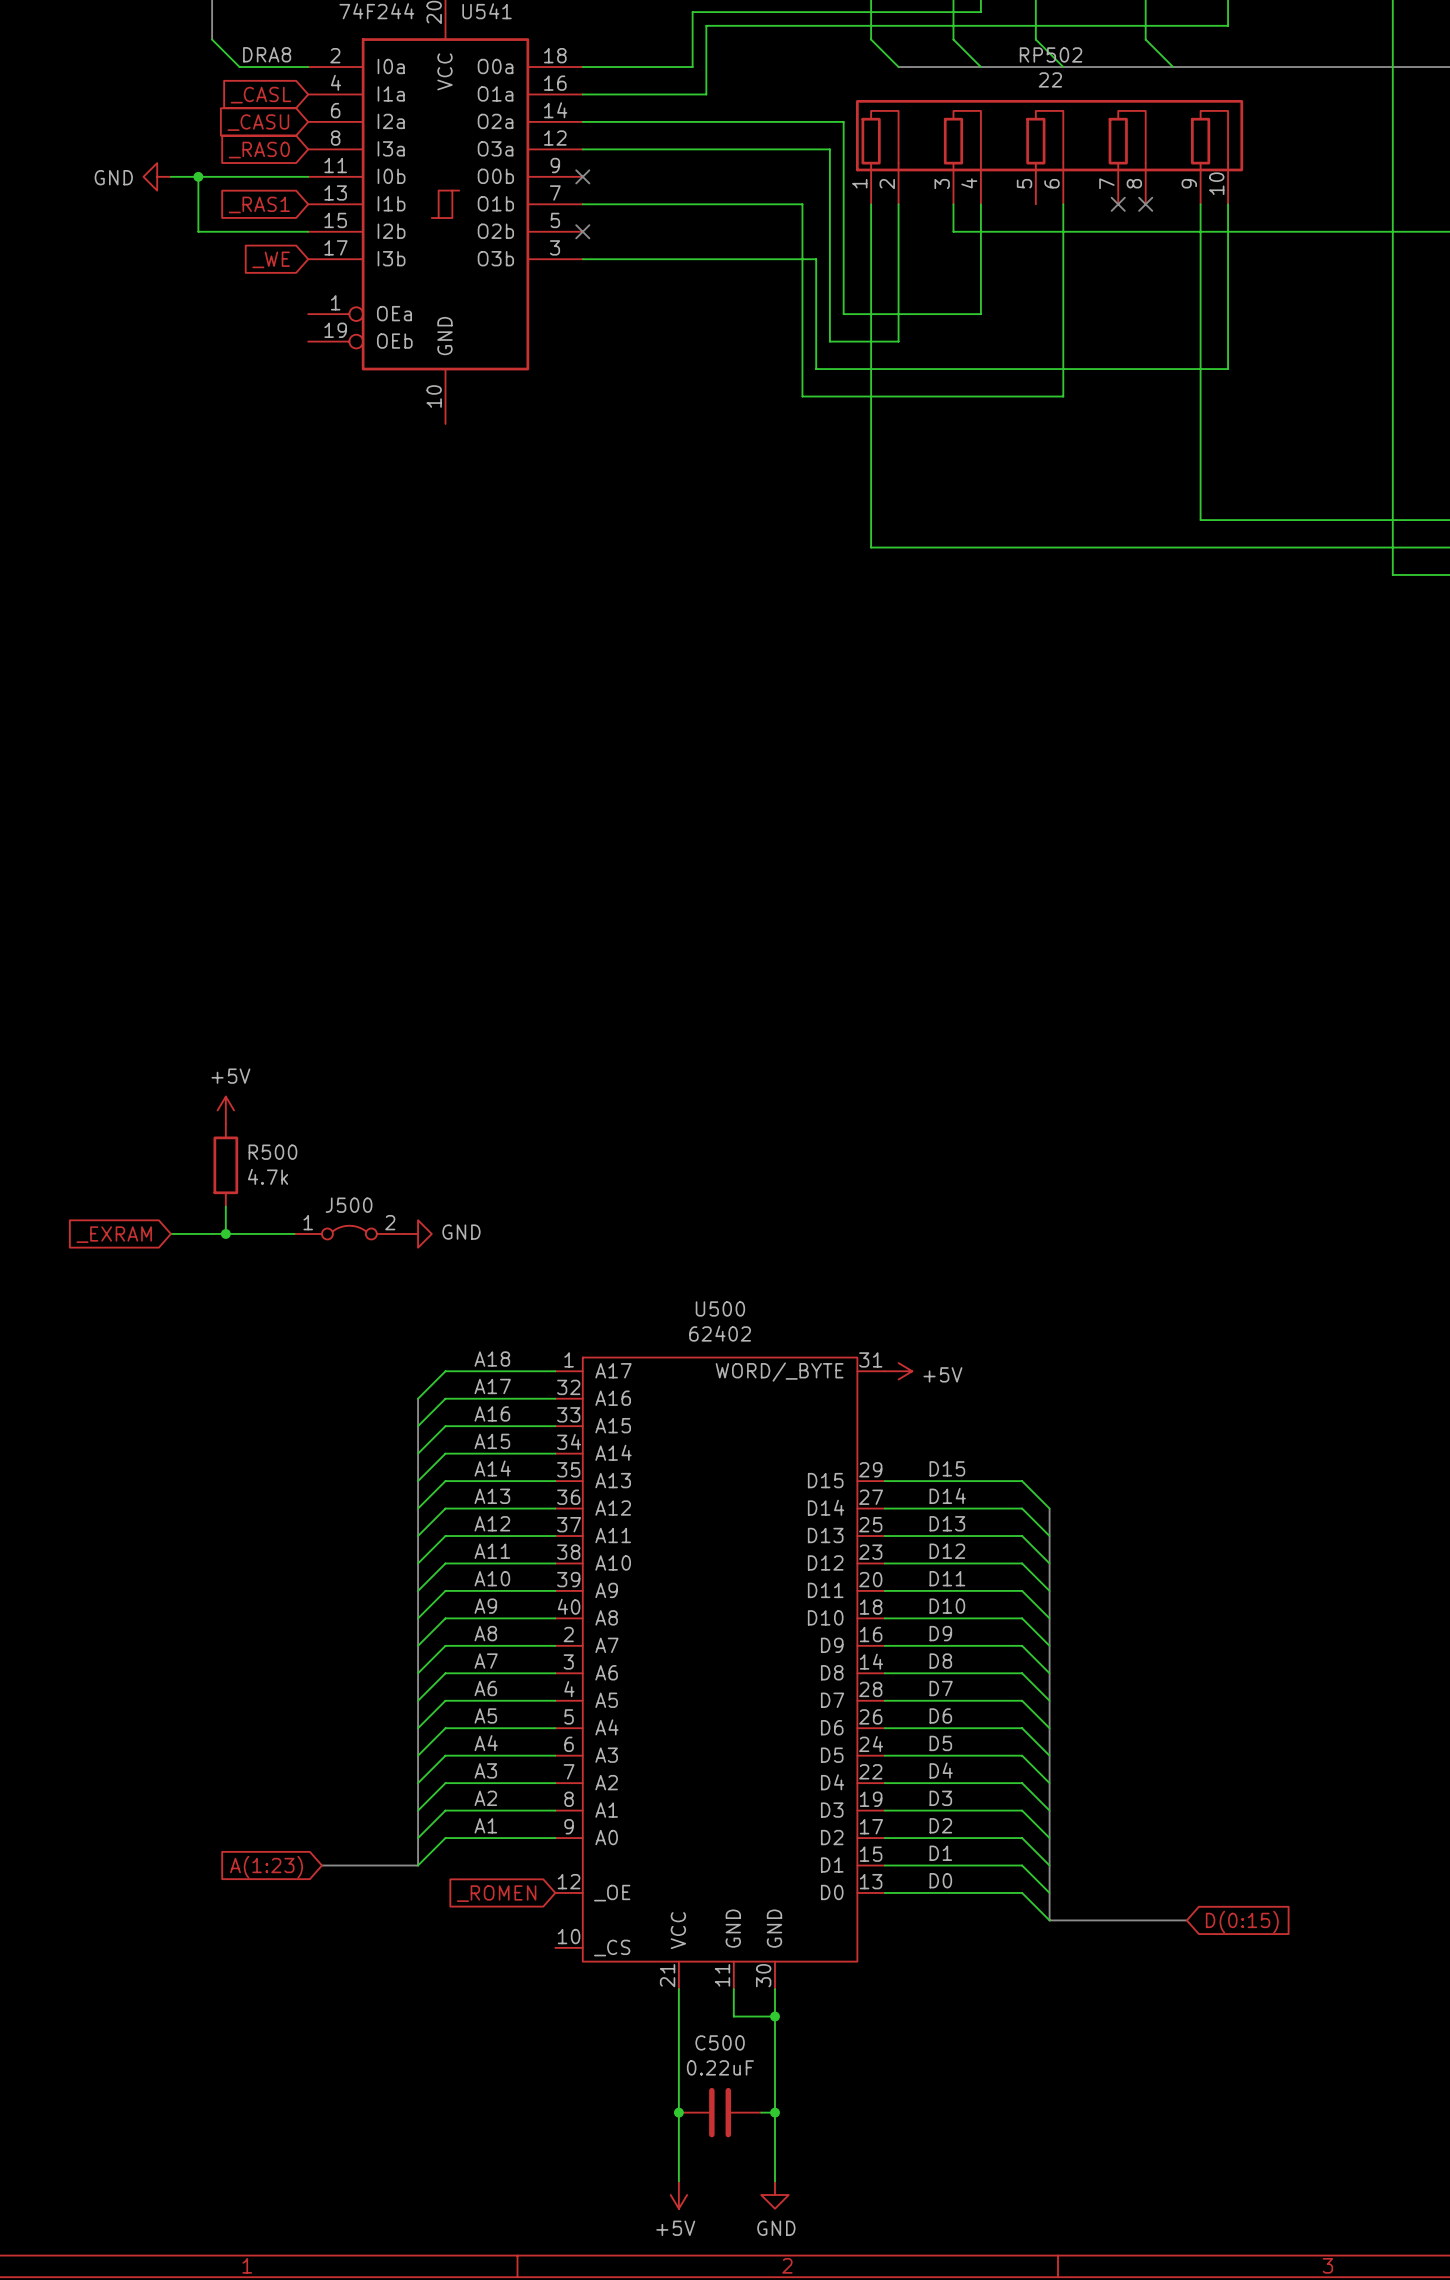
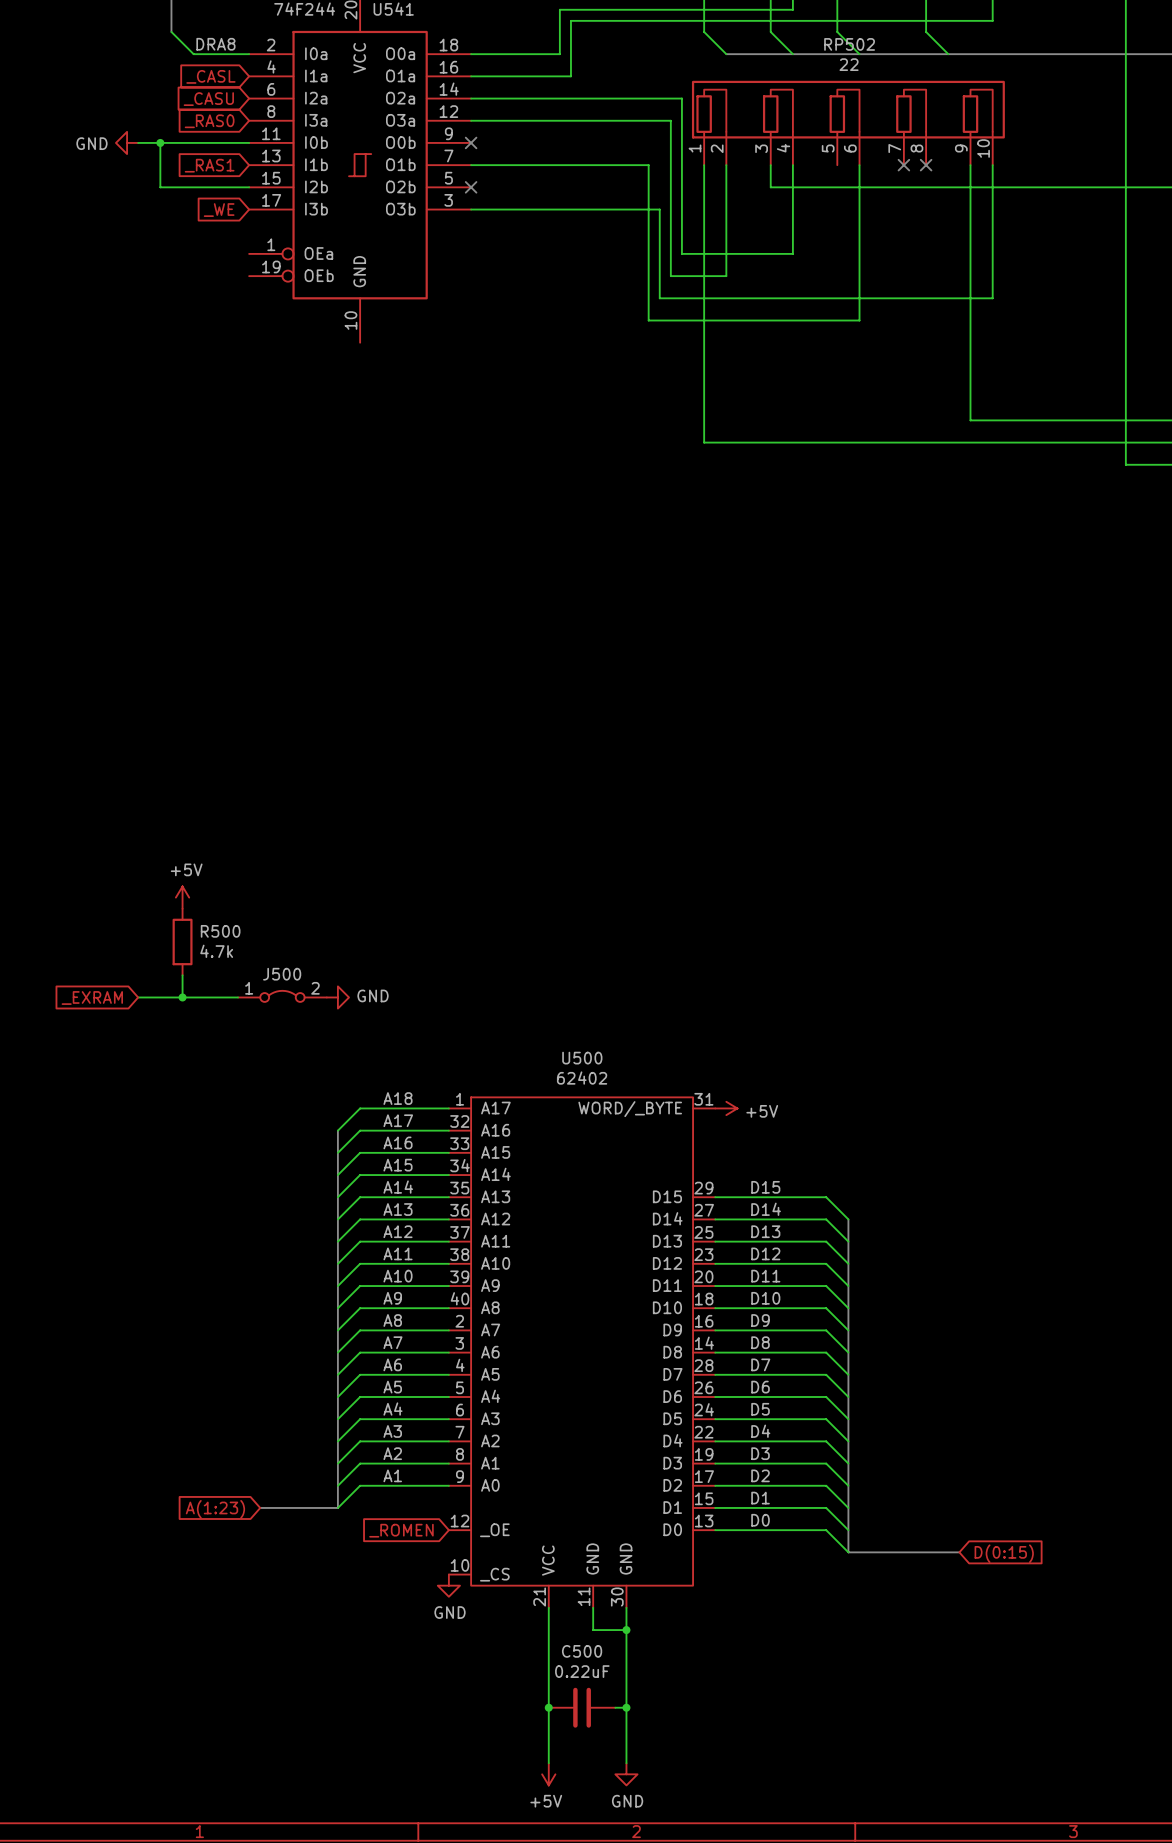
power symbol: none -> GND (448, 1585)

